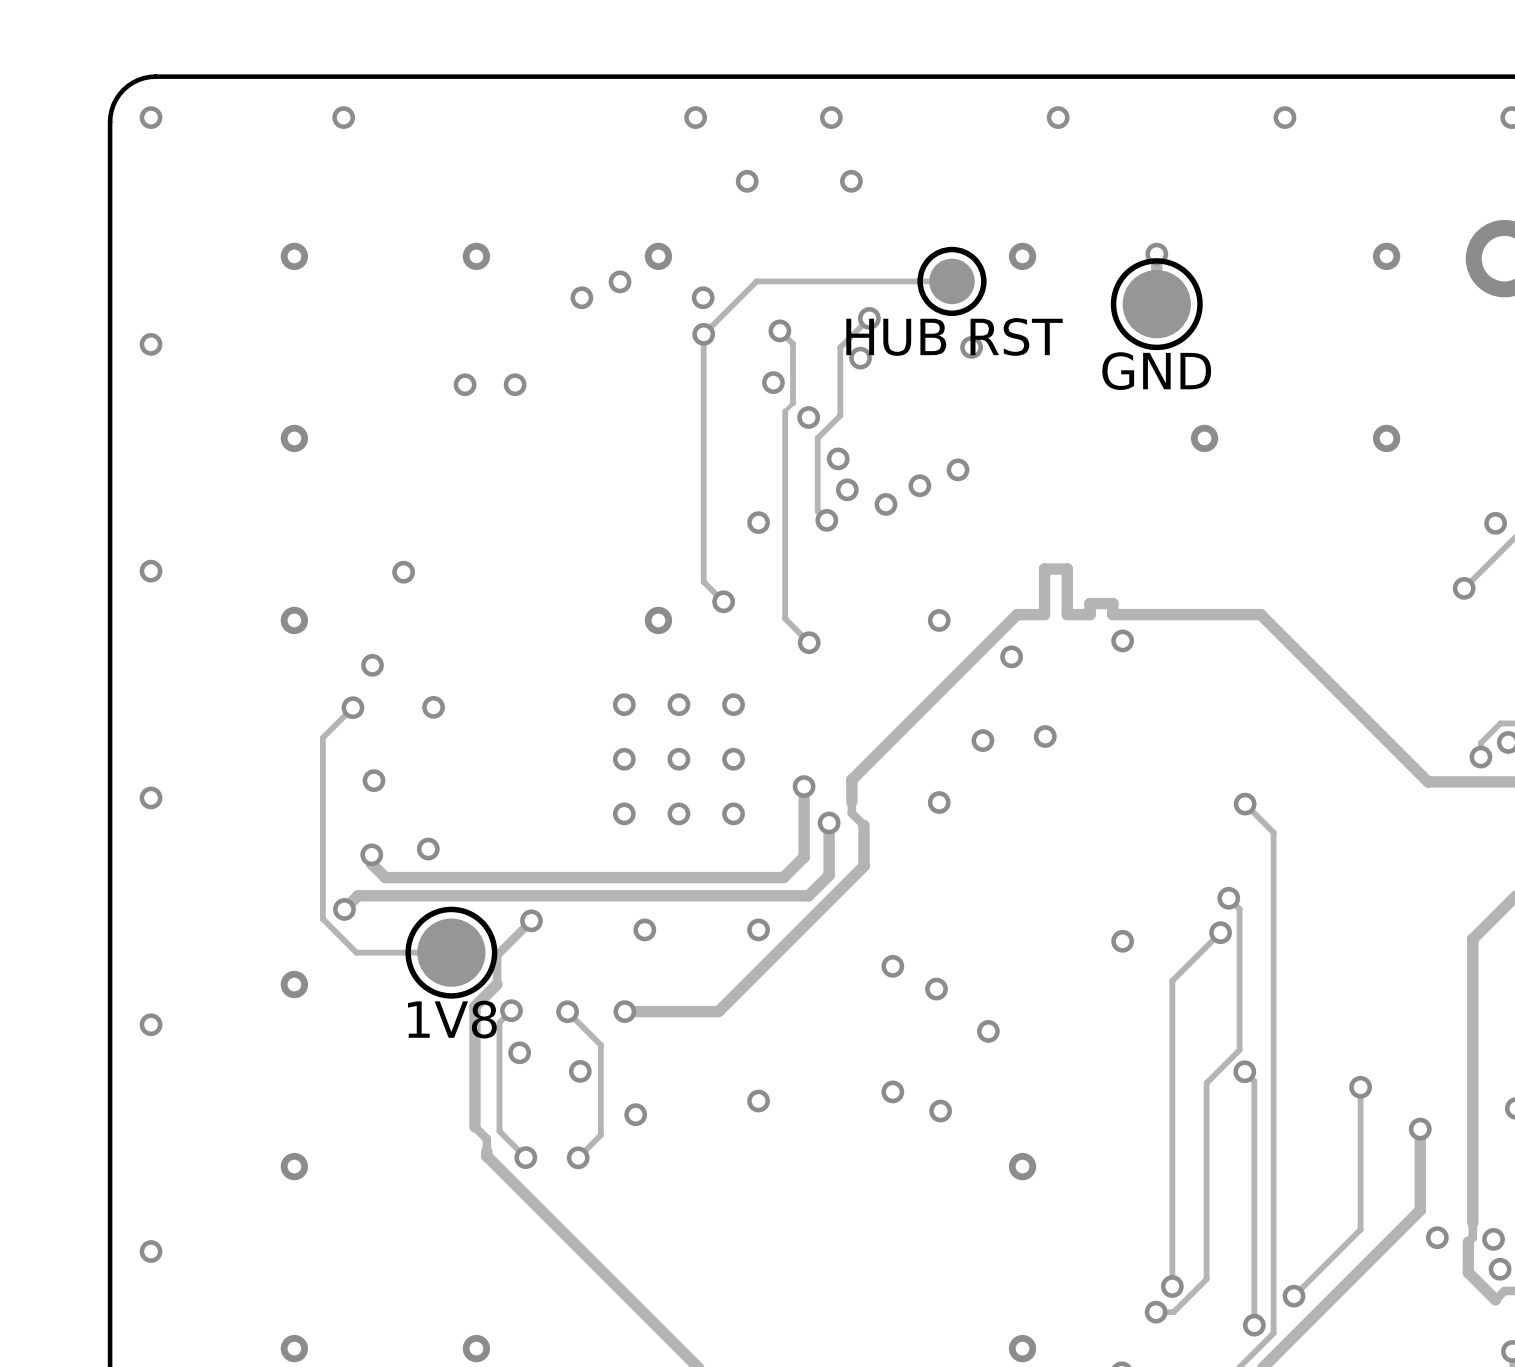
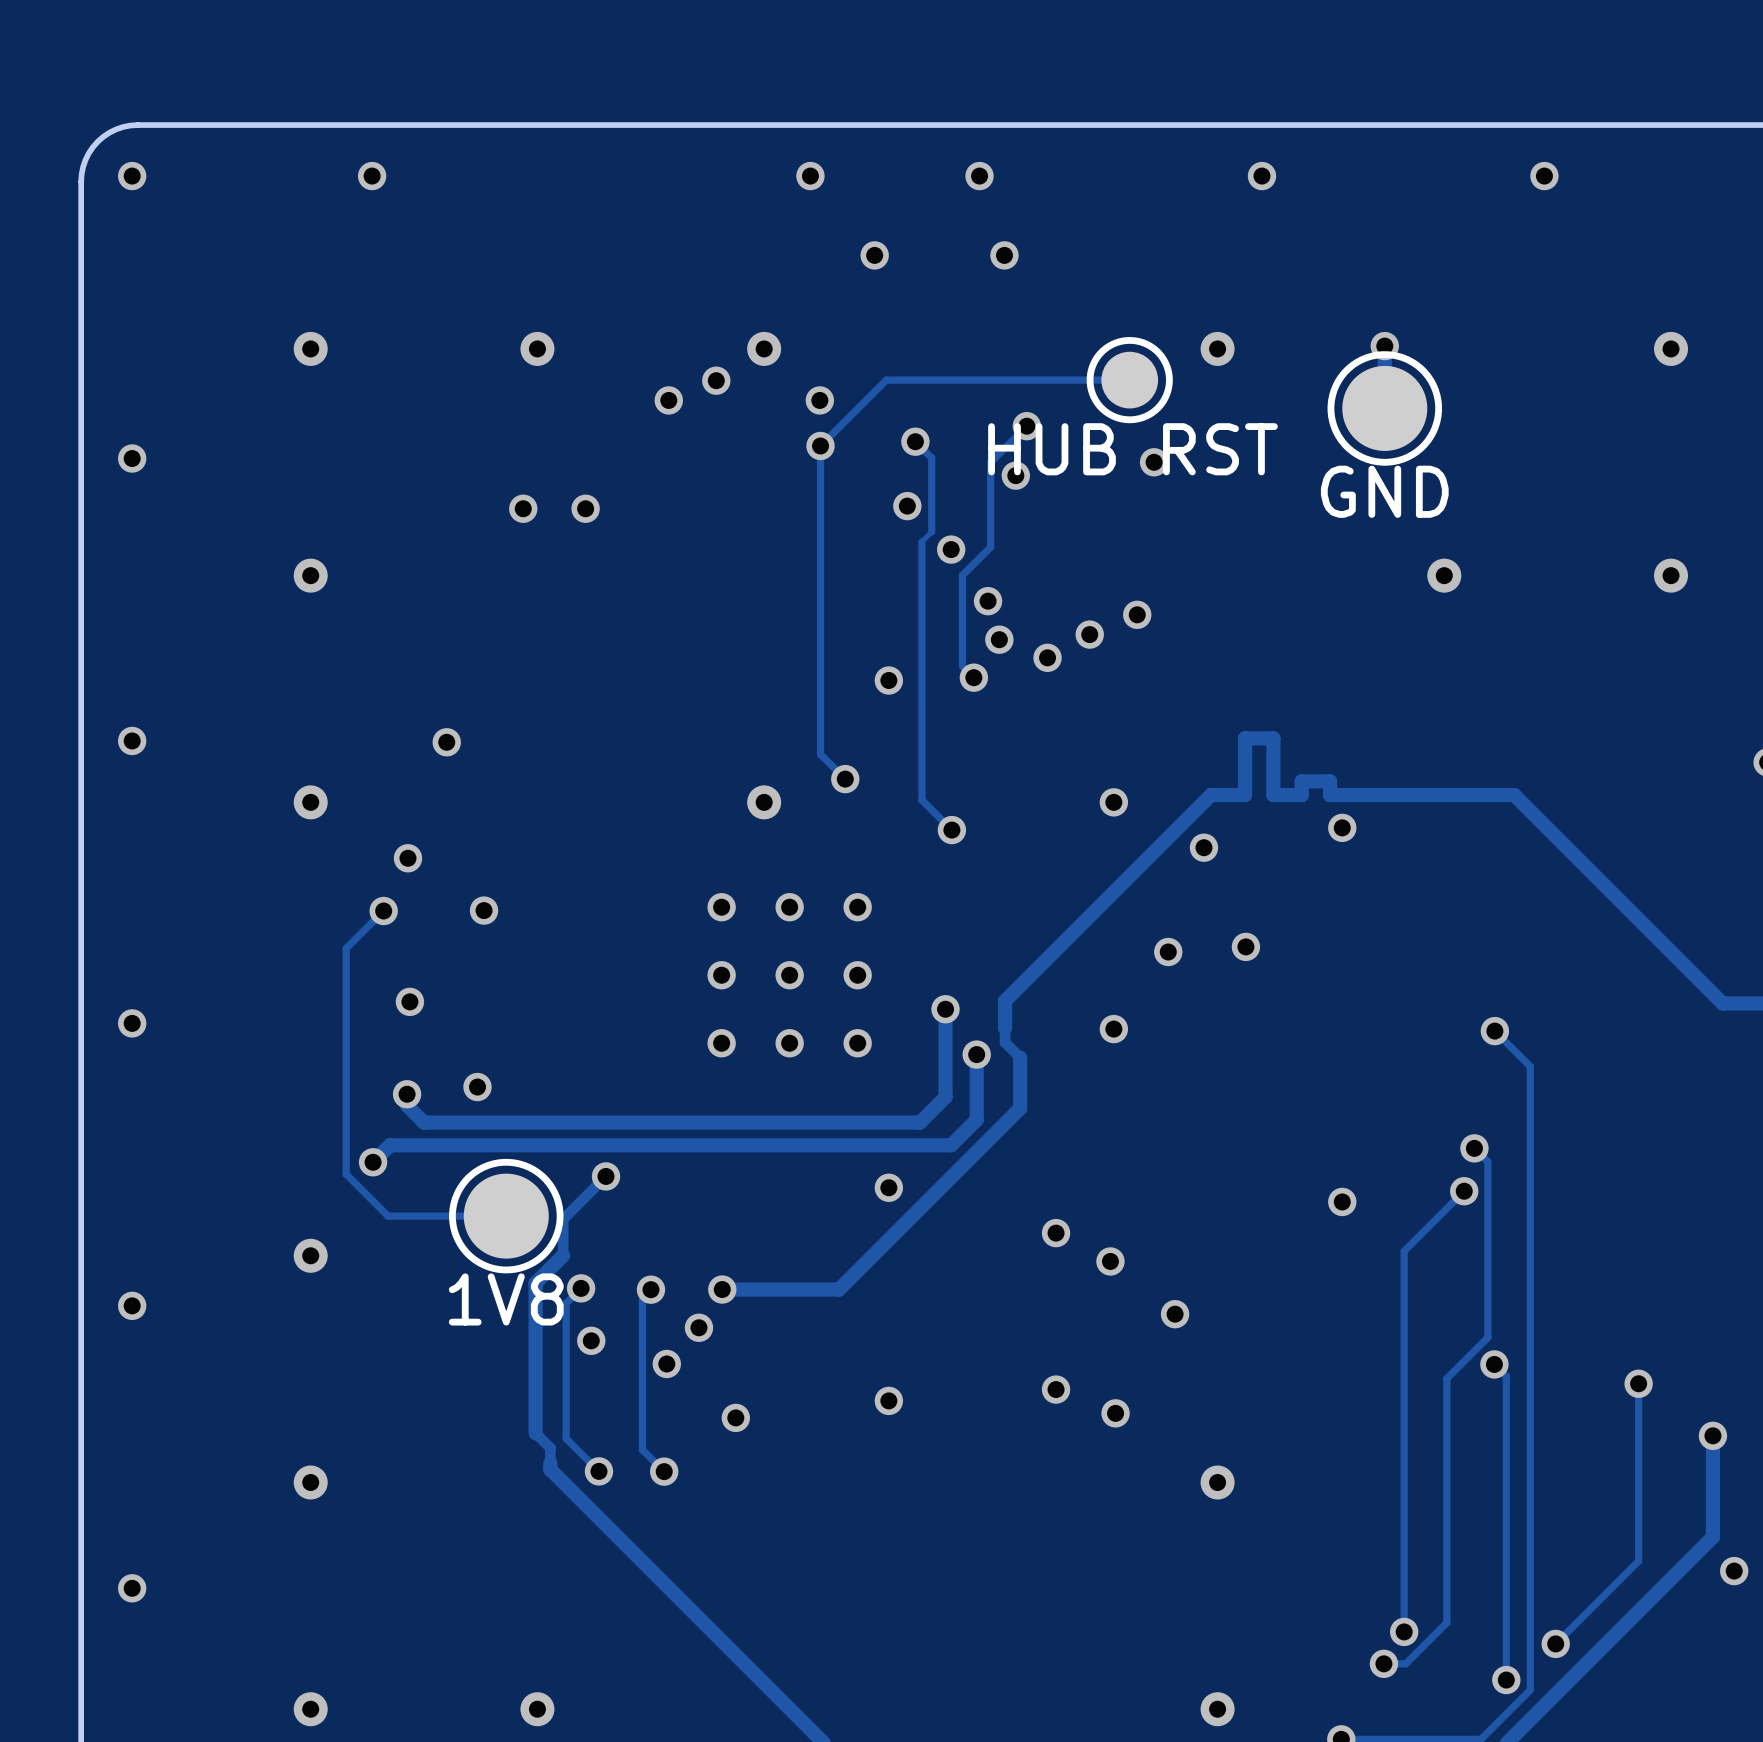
via position: (644, 929) -> (698, 1327)
track: (567, 1011) (600, 1044) (600, 1135) (578, 1157) -> (650, 1289) (642, 1298) (642, 1449) (664, 1471)

